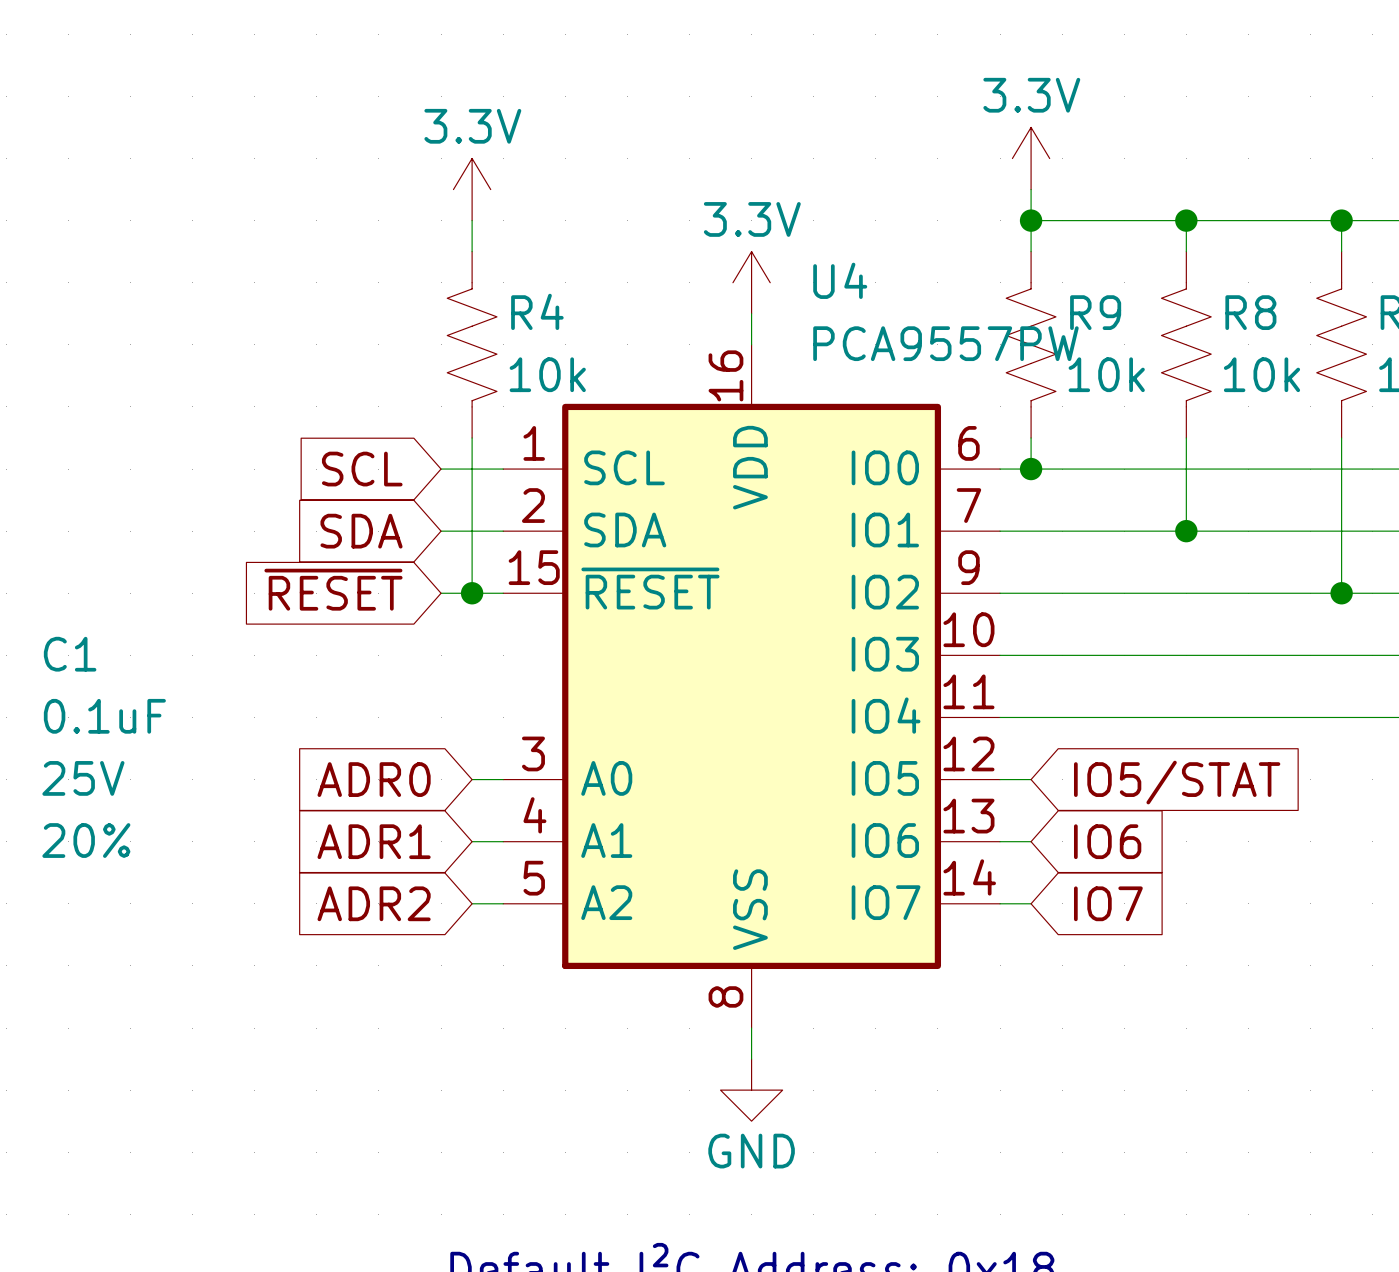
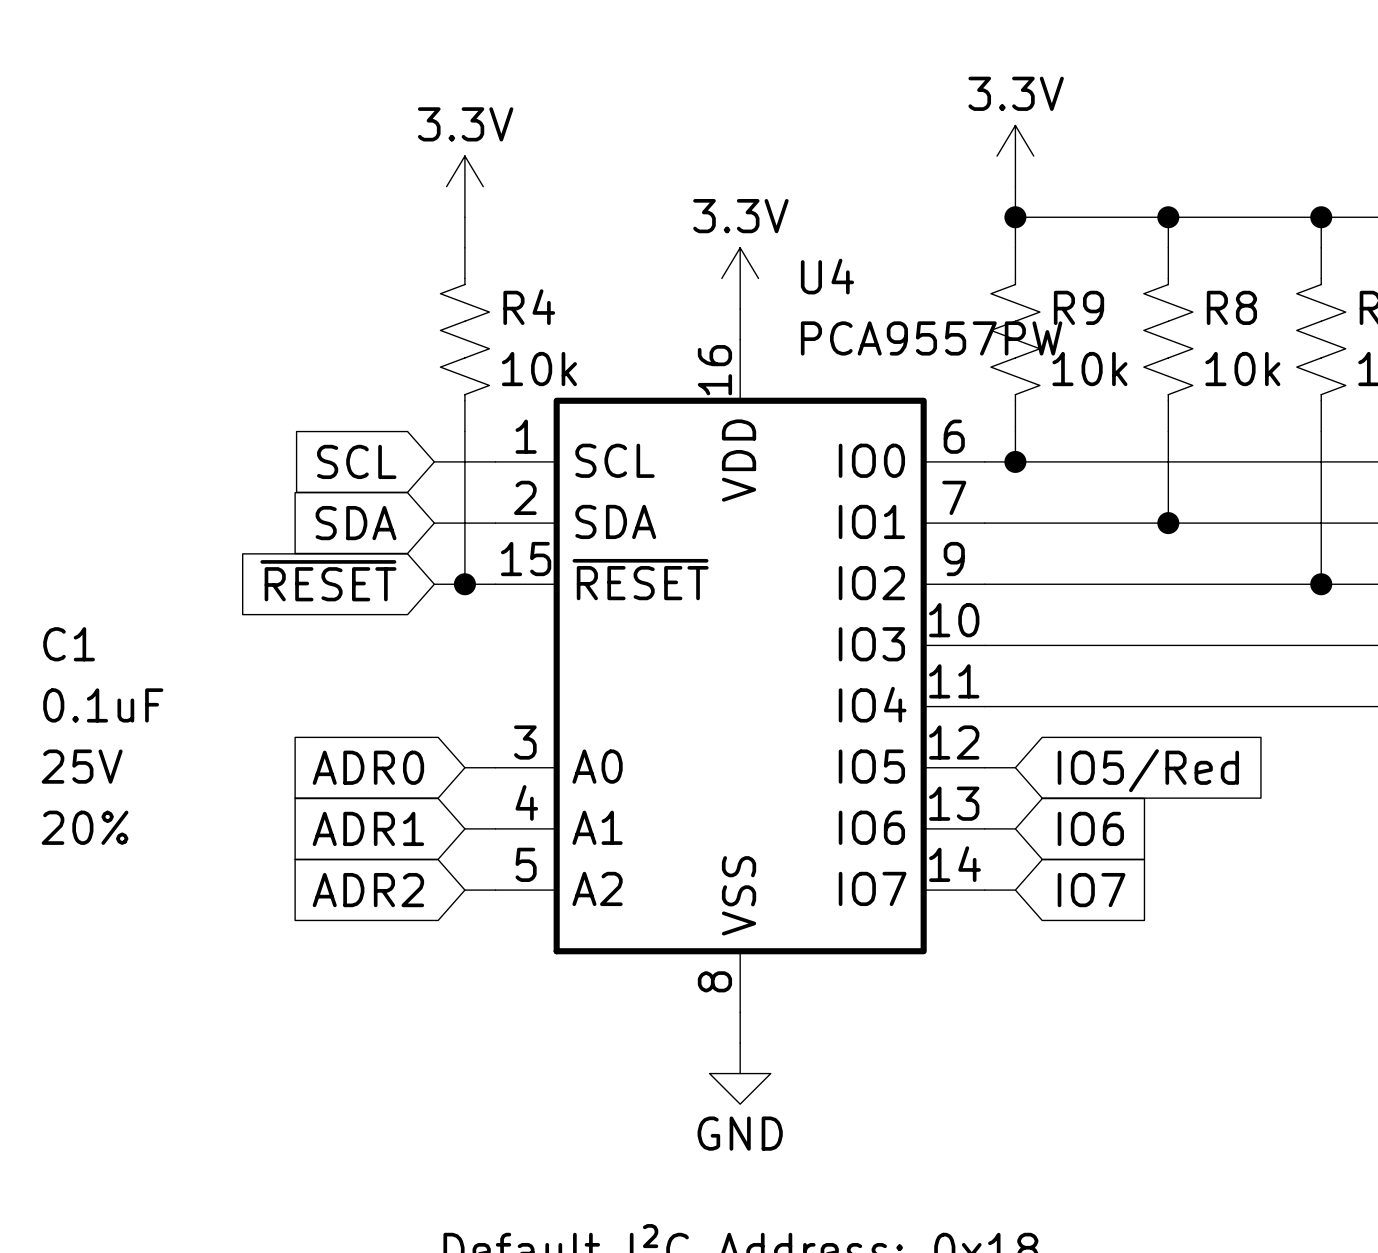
global label: IO5/STAT (1177, 782) -> IO5/Red (1148, 770)

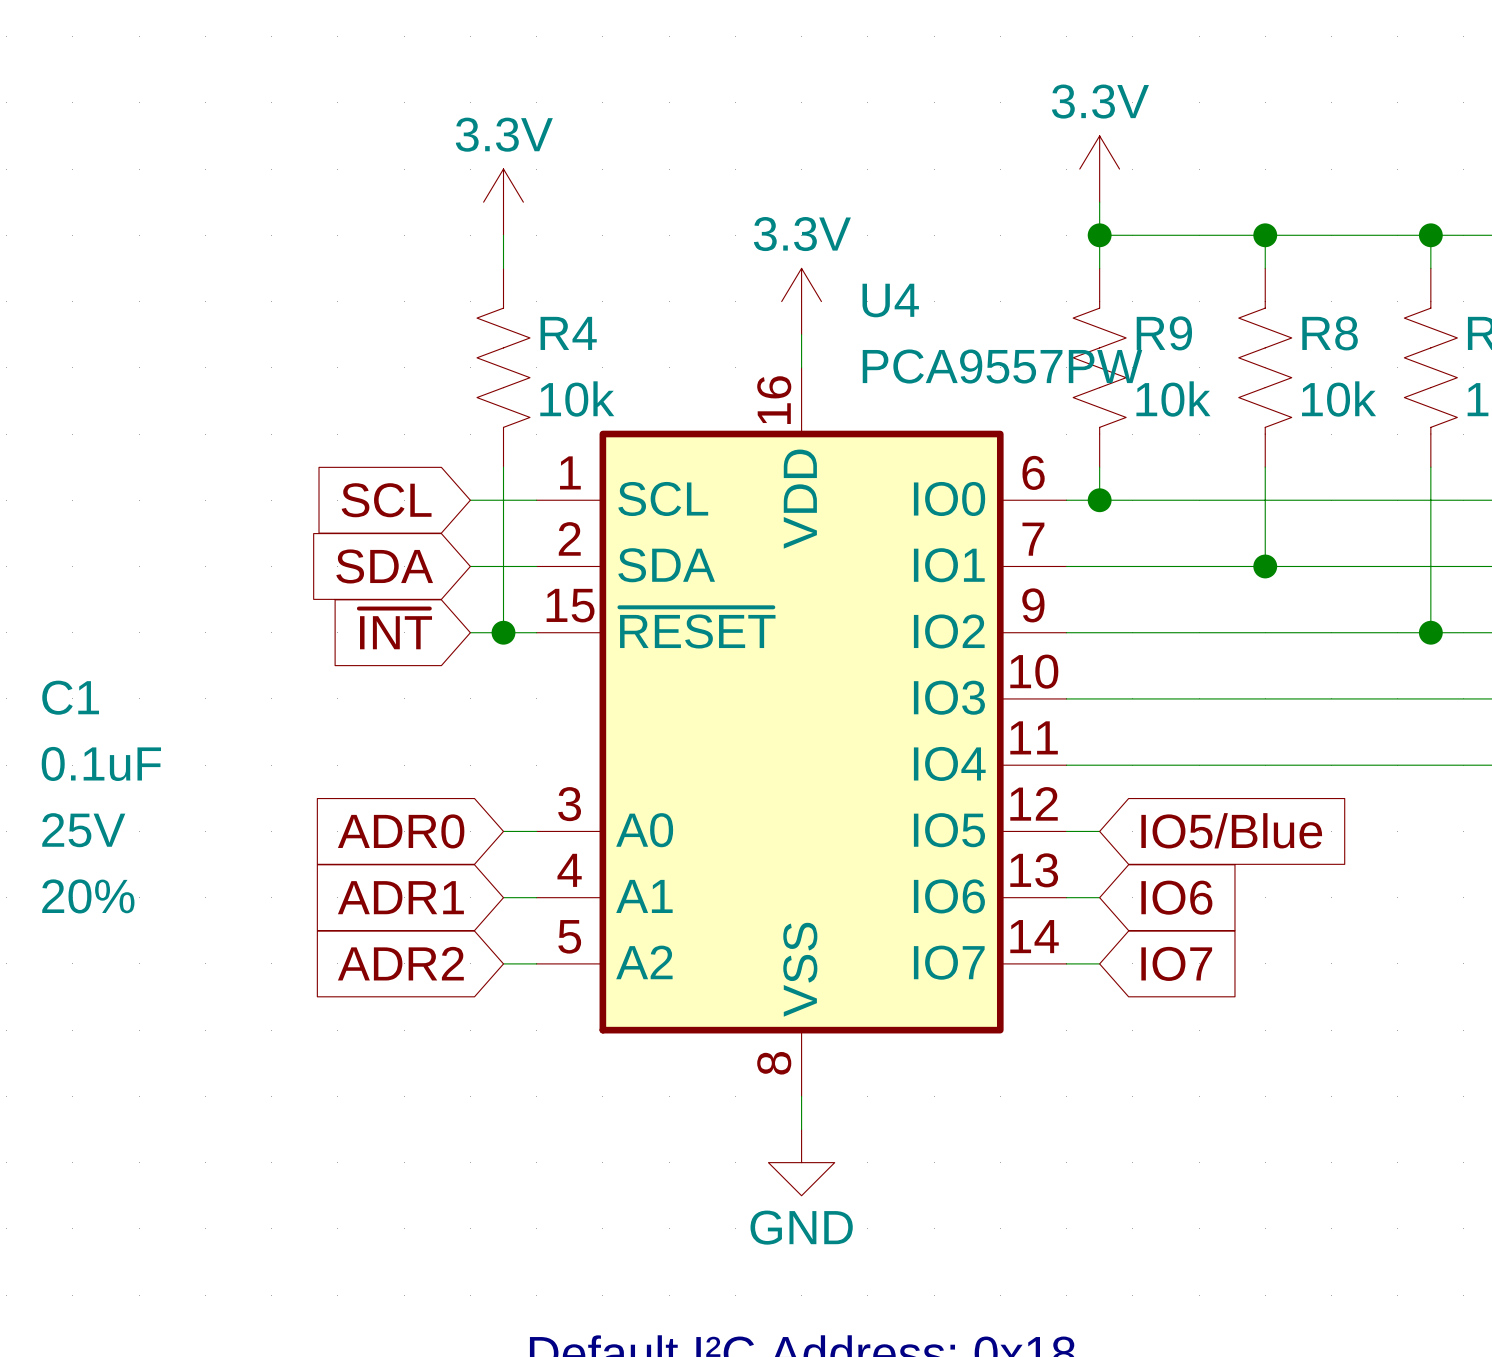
global label: ~{RESET} (328, 580) -> ~{INT} (395, 628)
global label: IO5/Red (1148, 770) -> IO5/Blue (1231, 830)

